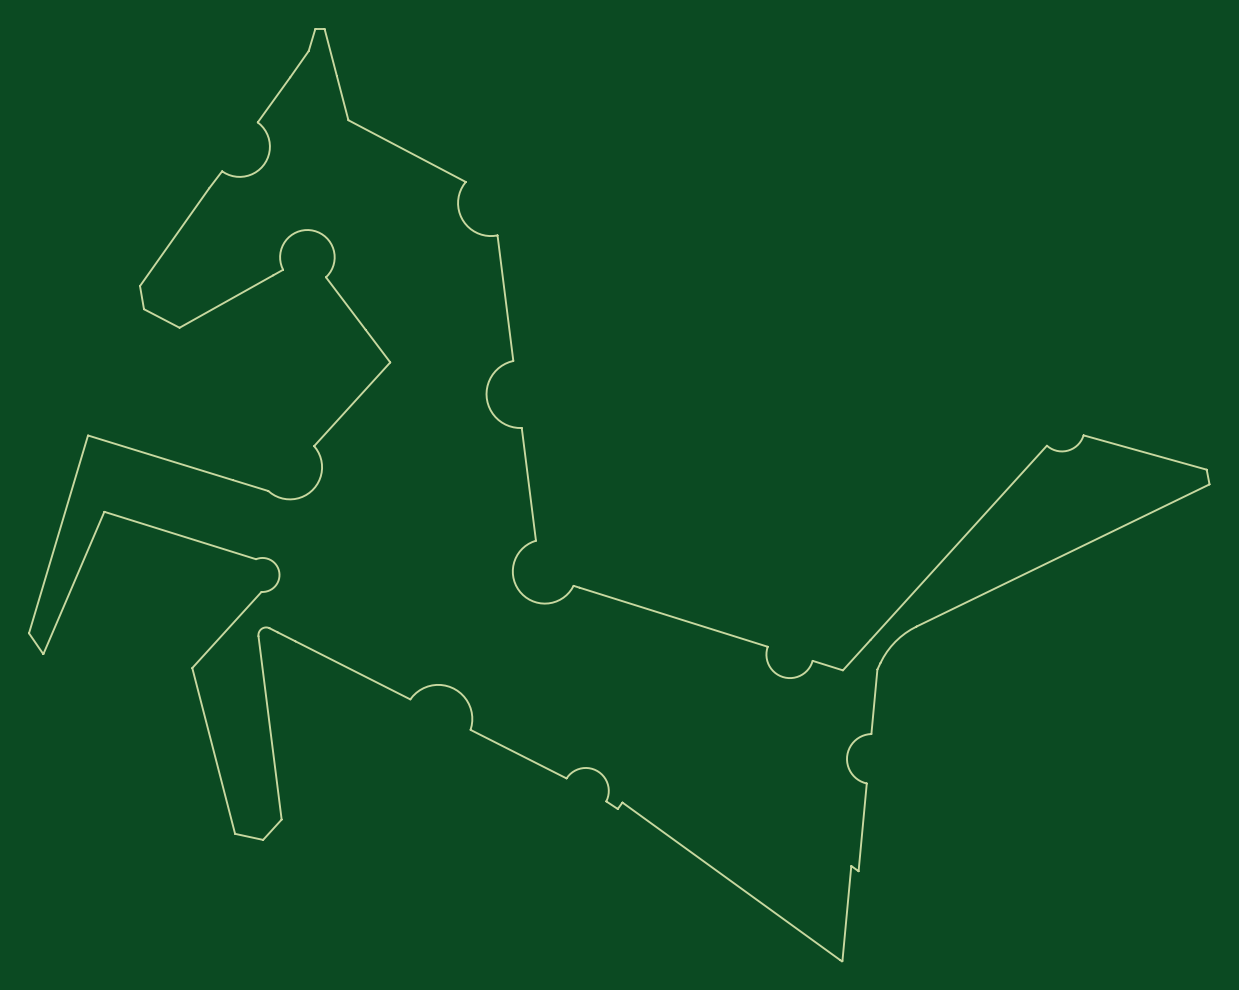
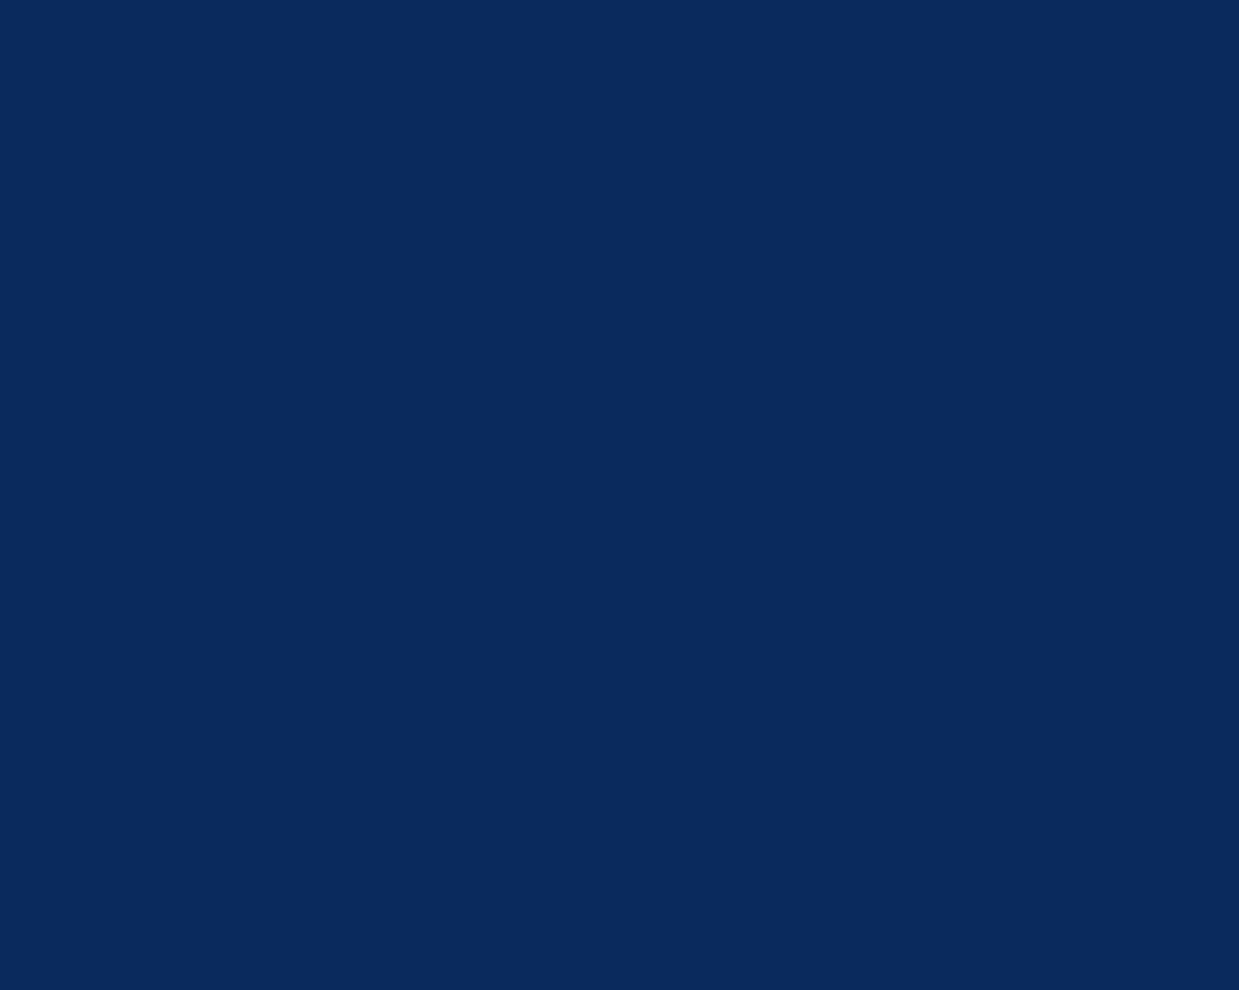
board edge: (315, 29) (308, 51) (257, 122) (265, 131) (269, 142) (269, 149) (266, 161) (258, 170) (248, 175) (236, 176) (222, 171) (140, 286) (143, 309) (179, 327) (283, 269) (280, 256) (284, 242) (298, 231) (312, 230) (324, 236) (333, 247) (334, 261) (325, 277) (390, 362) (314, 446) (321, 460) (320, 476) (312, 490) (298, 498) (282, 498) (268, 491) (88, 435) (29, 633) (43, 653) (104, 511) (256, 559) (268, 559) (274, 562) (278, 570) (279, 578) (276, 584) (269, 590) (261, 591) (192, 668) (235, 833) (263, 839) (281, 819) (258, 636) (260, 630) (266, 627) (410, 699) (416, 692) (427, 686) (440, 684) (453, 688) (460, 693) (468, 704) (472, 716) (470, 729) (566, 778) (572, 772) (580, 768) (589, 768) (597, 771) (603, 776) (607, 784) (608, 793) (606, 801) (617, 808) (622, 802) (842, 961) (851, 865) (858, 871) (866, 783) (858, 780) (851, 773) (847, 765) (847, 756) (849, 748) (854, 740) (862, 735) (871, 734) (877, 669) (887, 651) (900, 637) (916, 626) (1209, 484) (1206, 469) (1083, 435) (1077, 444) (1068, 450) (1056, 450) (1046, 445) (842, 670) (812, 660) (808, 668) (802, 674) (794, 677) (782, 677) (775, 672) (769, 666) (766, 658) (767, 646) (573, 585) (566, 595) (556, 601) (544, 603) (529, 599) (517, 588) (512, 573) (514, 562) (519, 551) (535, 540) (521, 428) (509, 426) (498, 420) (490, 410) (486, 398) (487, 385) (492, 374) (501, 365) (513, 360) (497, 235) (477, 233) (462, 219) (458, 200) (465, 181) (348, 120) (324, 29) (315, 29) -> none

